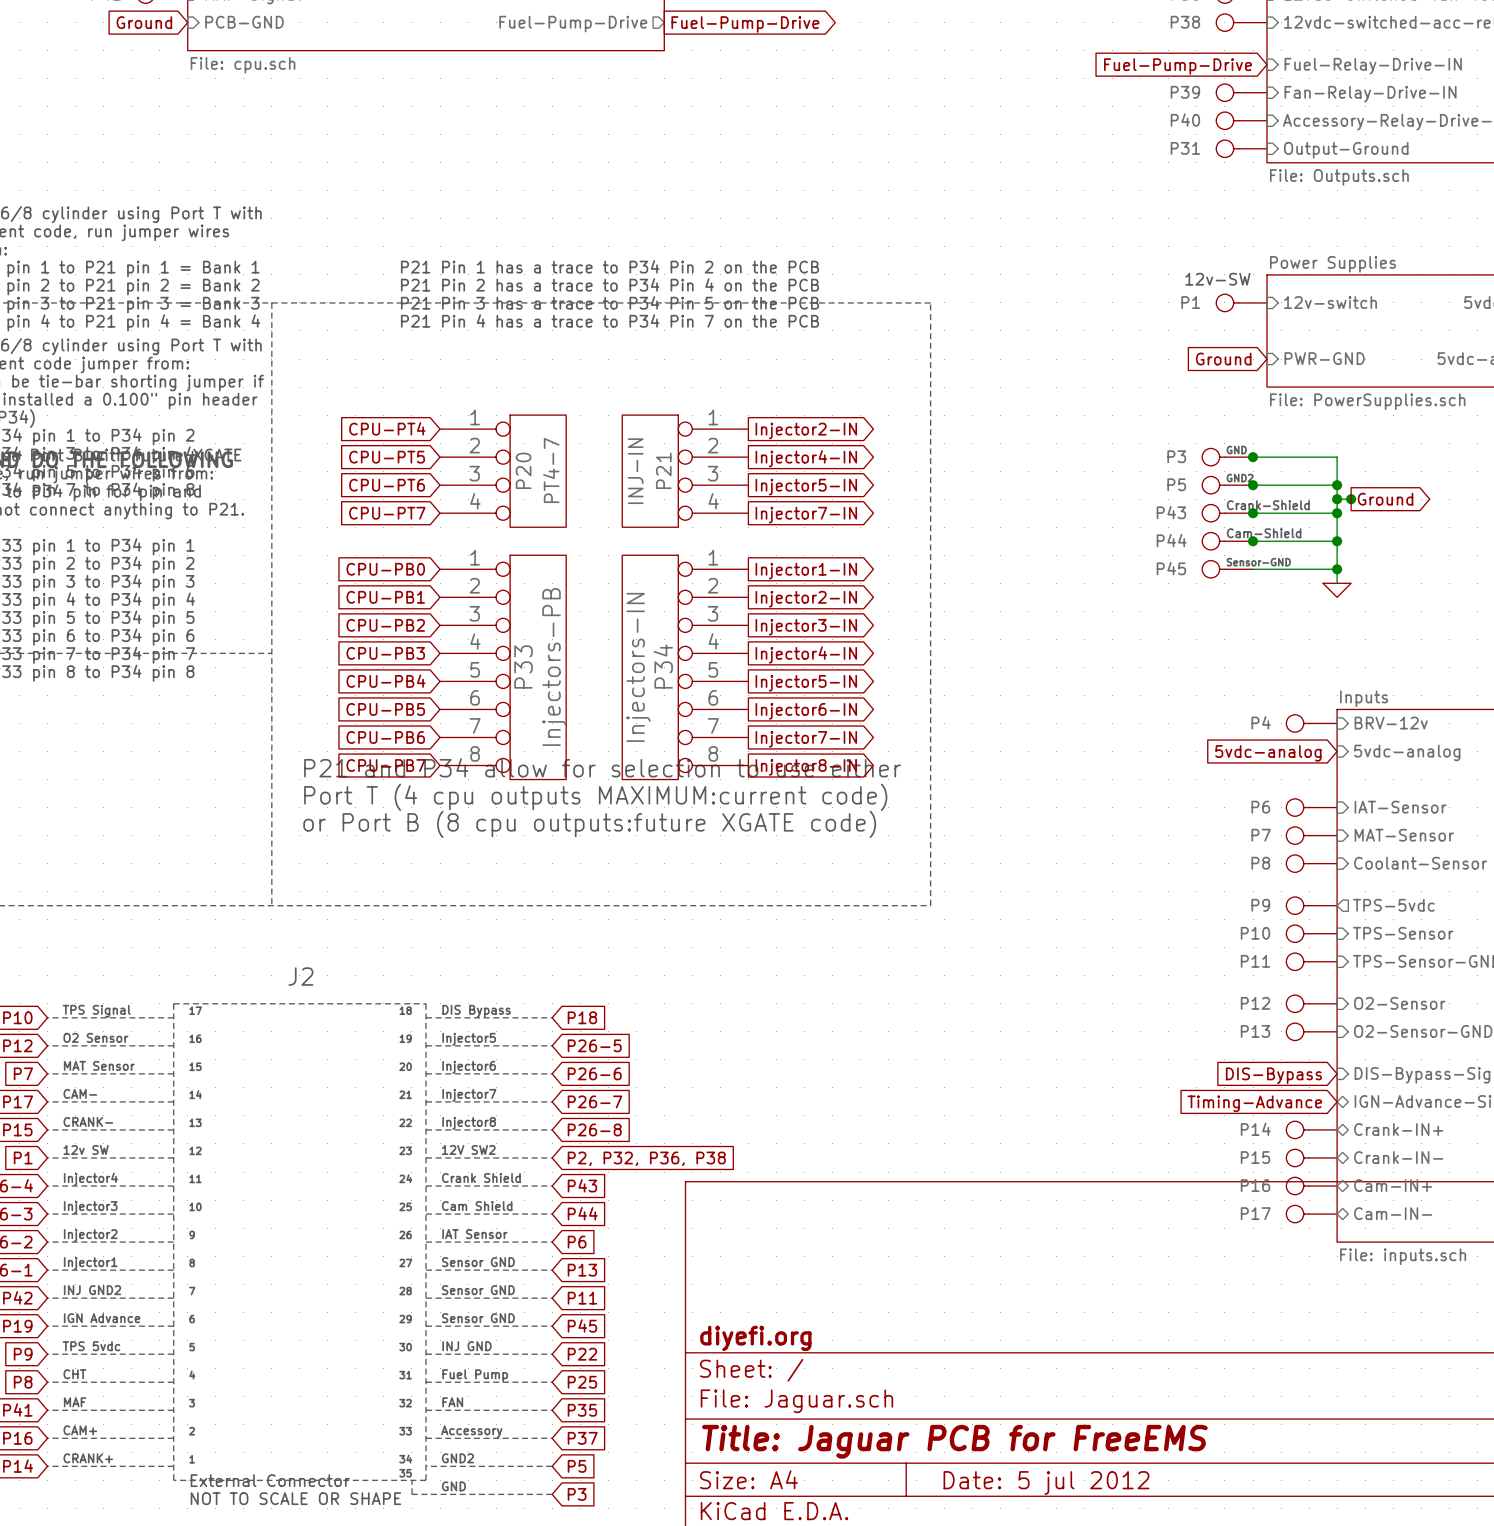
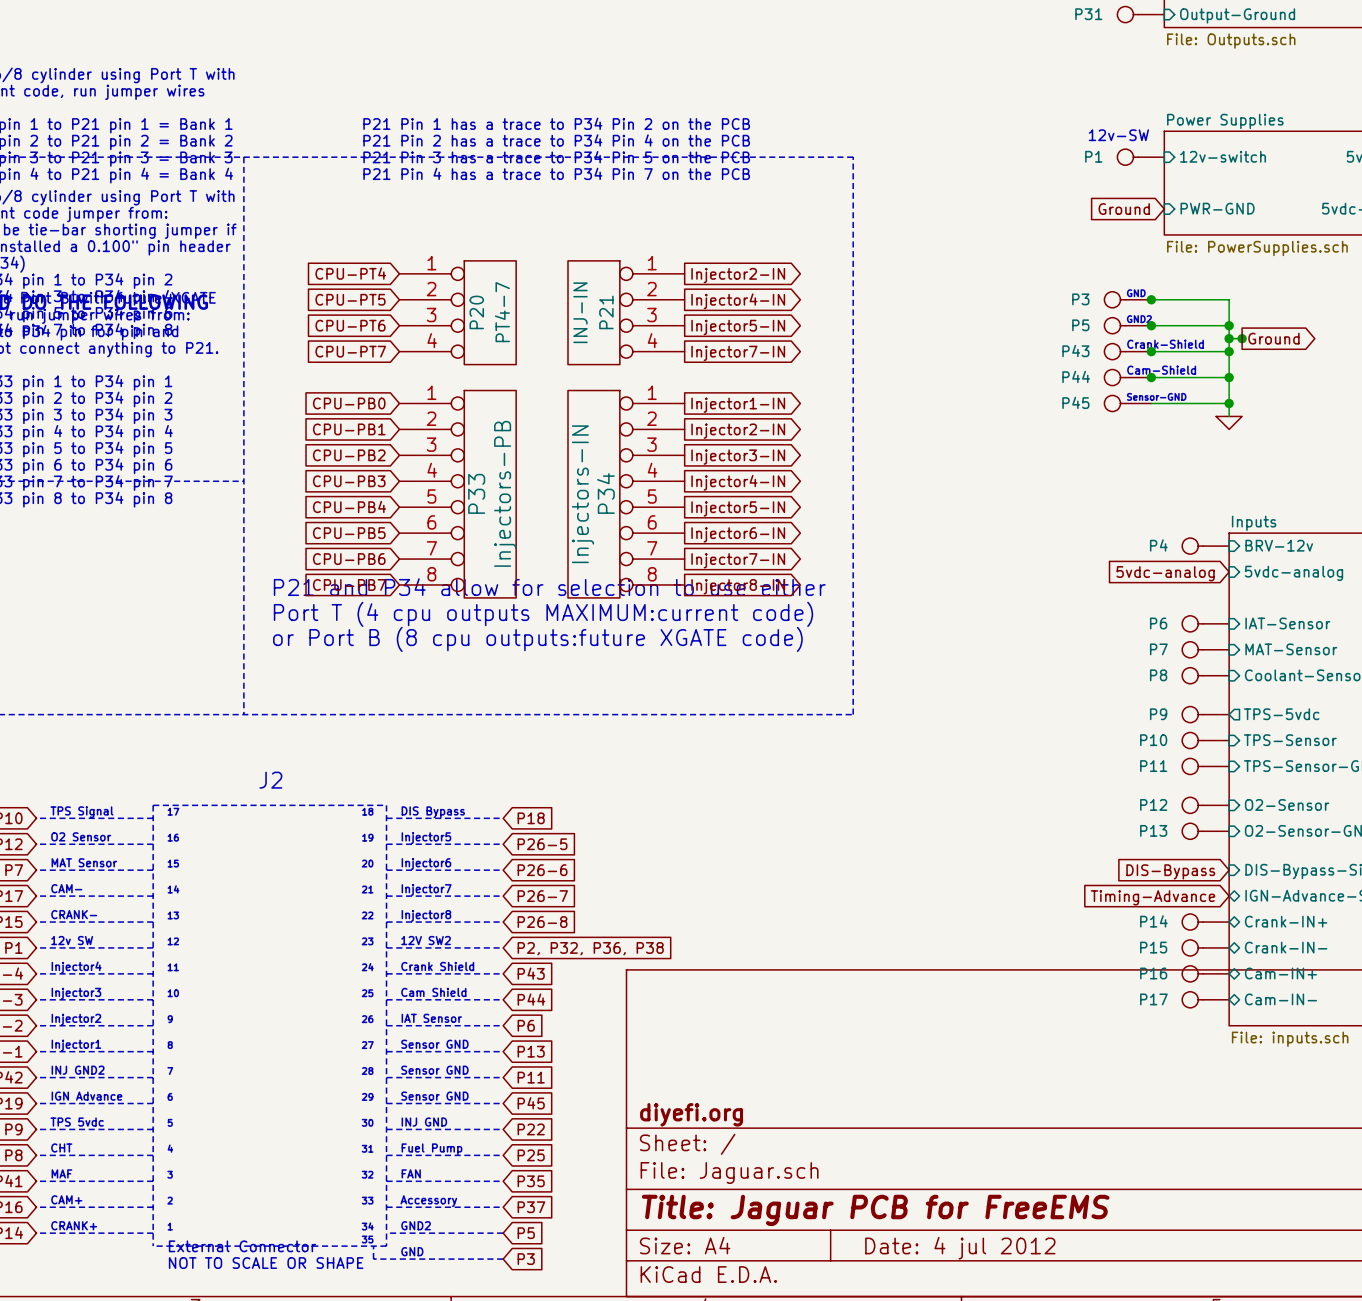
title block: Date: 5 jul 2012 (1046, 1482) -> Date: 4 jul 2012 (960, 1248)

